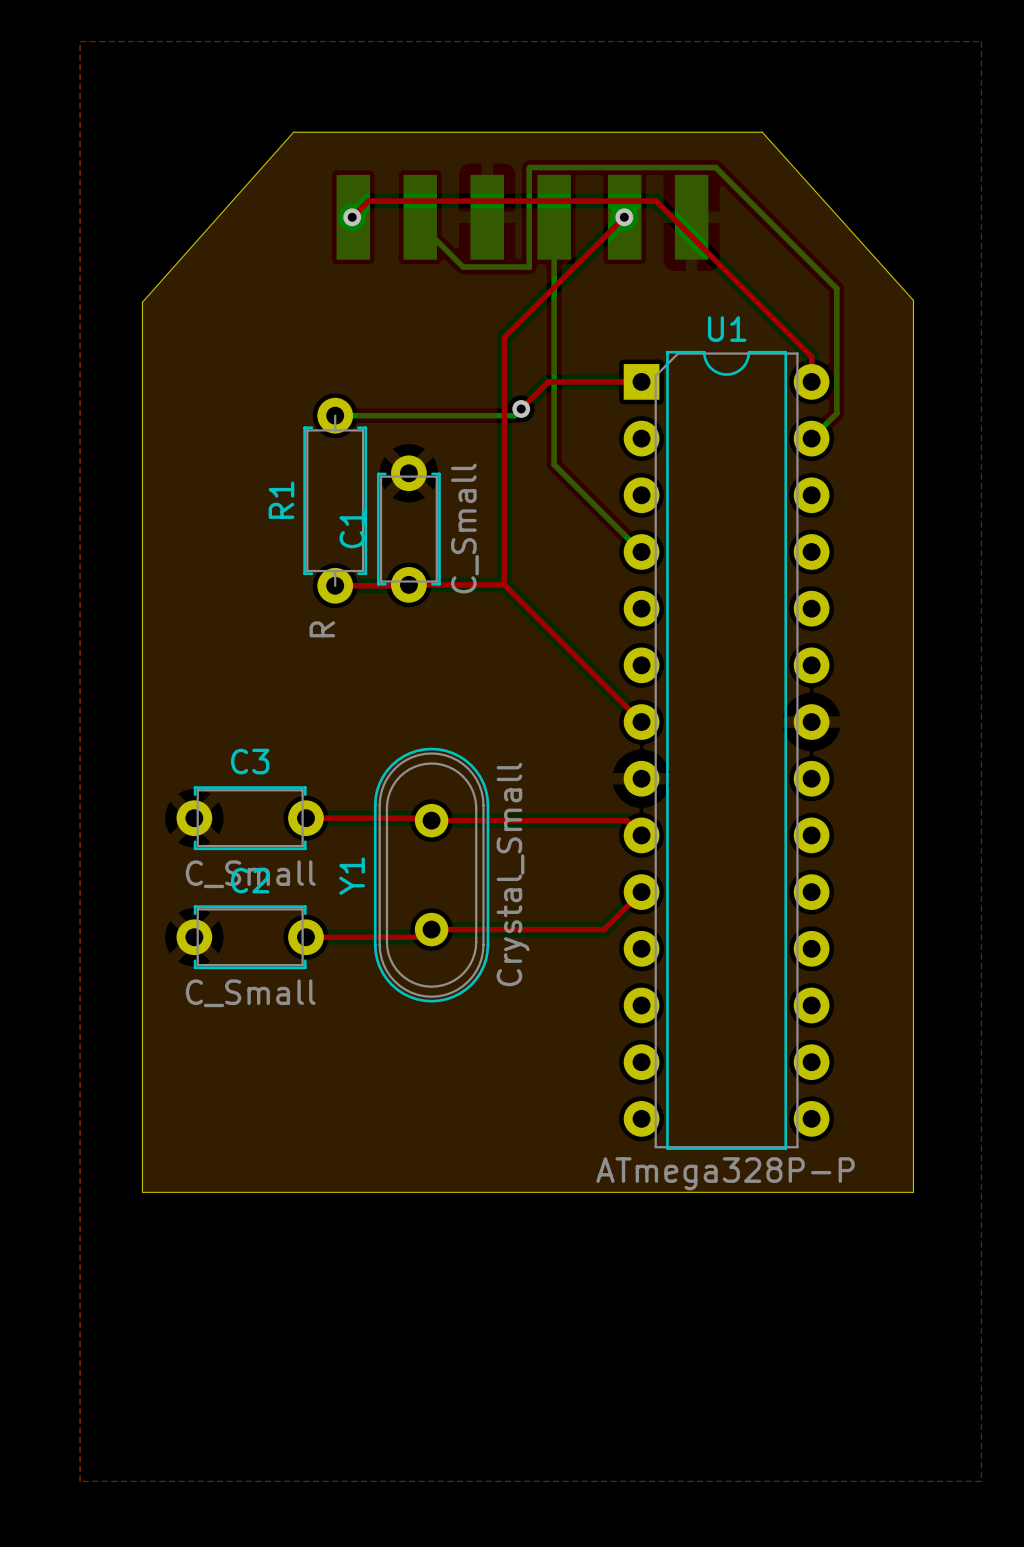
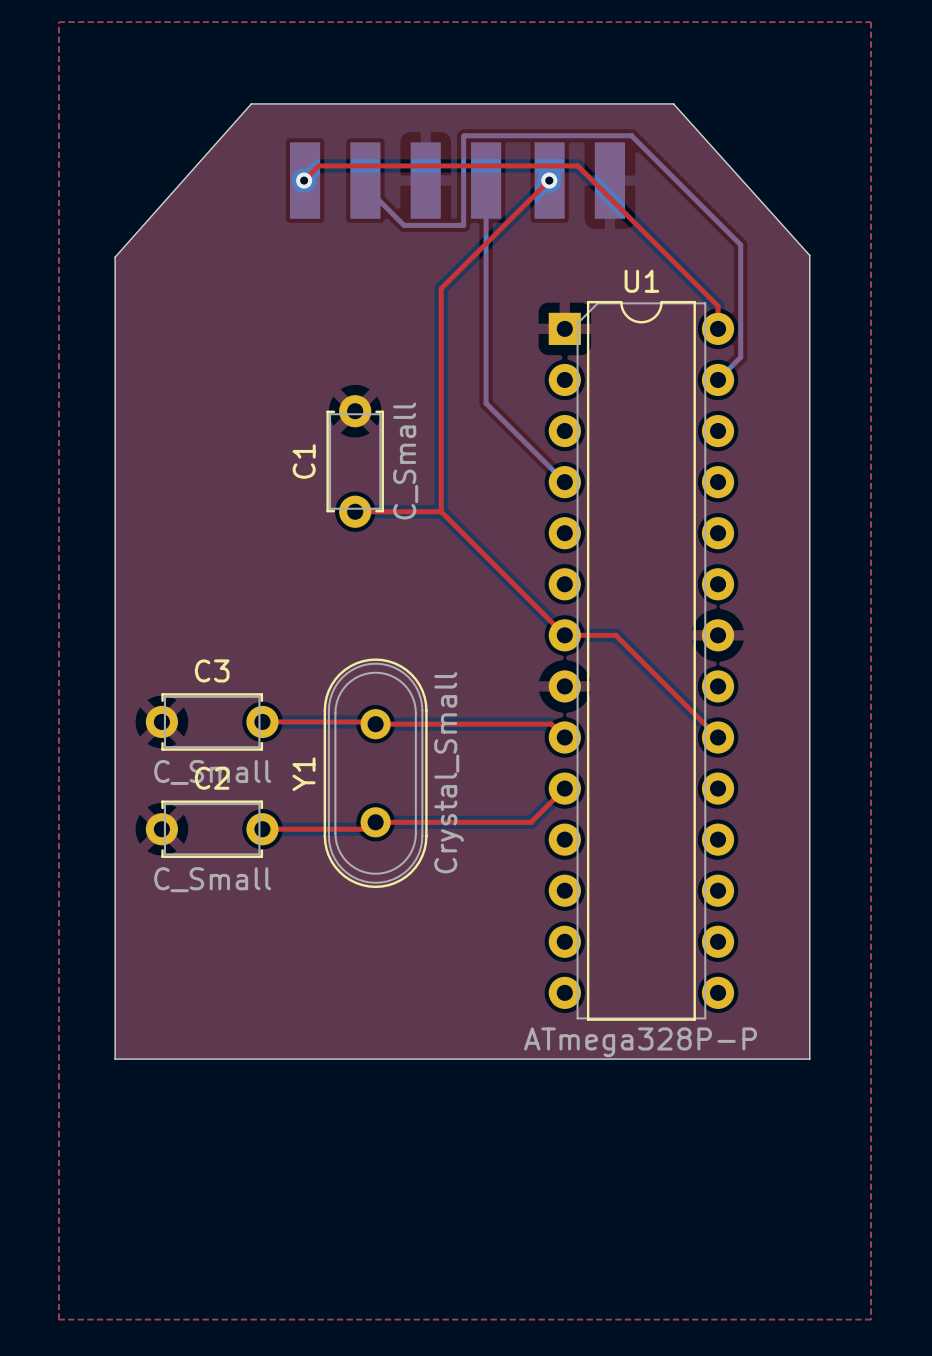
top track: (641, 381) (548, 381) (521, 408) -> none
bottom track: (521, 408) (514, 415) (335, 415) -> none
via: (521, 408) -> none
R1: R (335, 500) -> none
top track: (335, 585) (408, 585) -> none
top track: none -> (564, 635) (615, 635) (718, 737)

